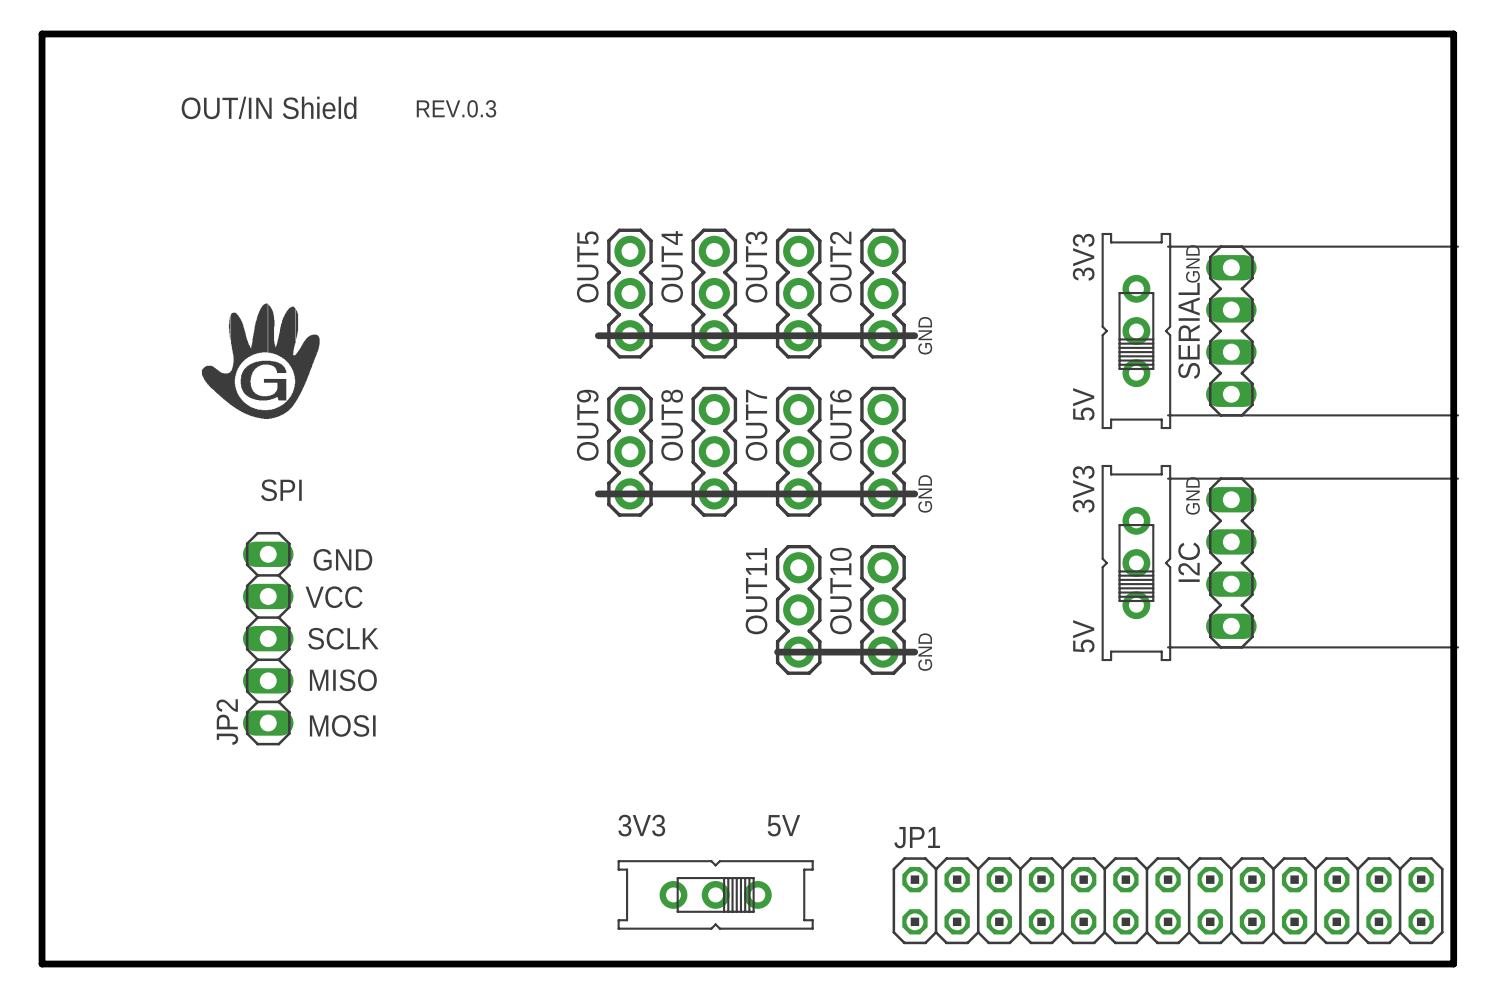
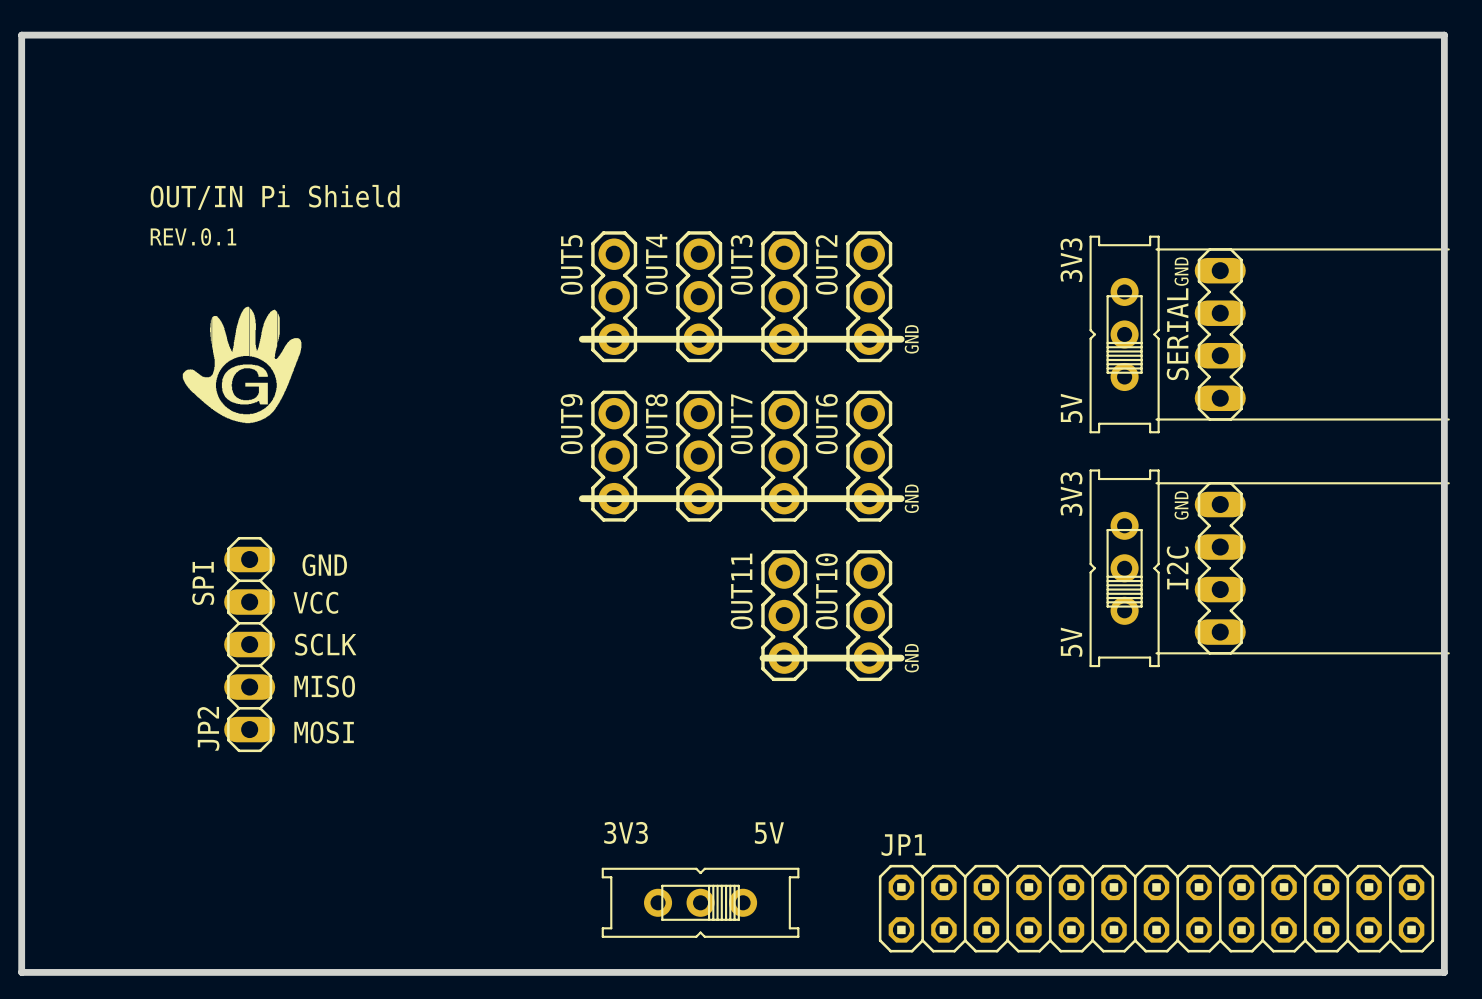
text: OUT/IN Shield (269, 107) -> none
text: REV.0.3 (456, 108) -> none
text: none -> OUT/IN Pi Shield (275, 197)
text: none -> REV.0.1 (193, 236)
text rotation: 0° (281, 490) -> 90° counterclockwise (203, 583)
text position: SPI (281, 490) -> SPI (203, 583)

